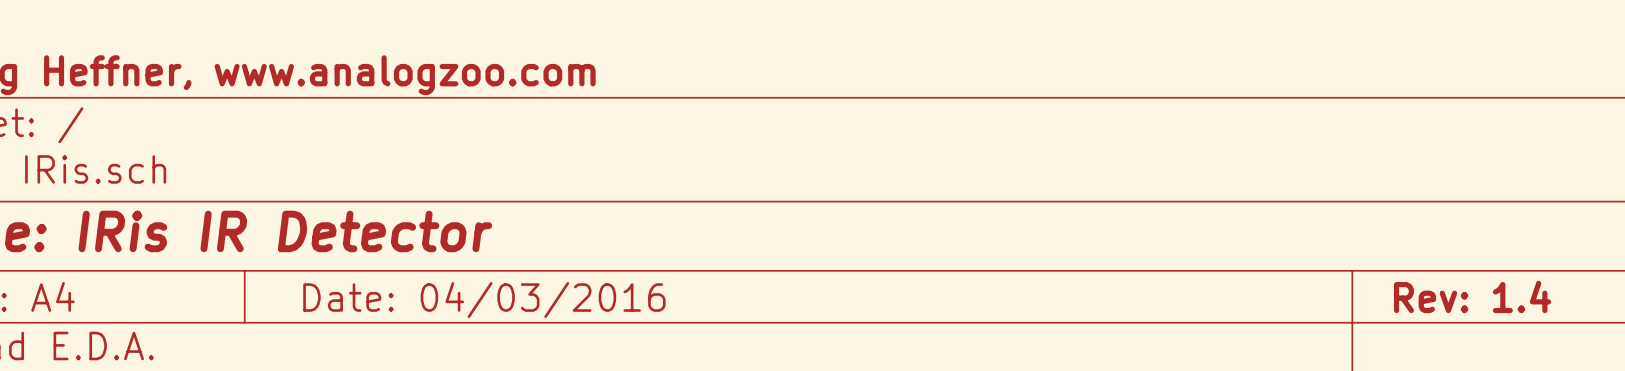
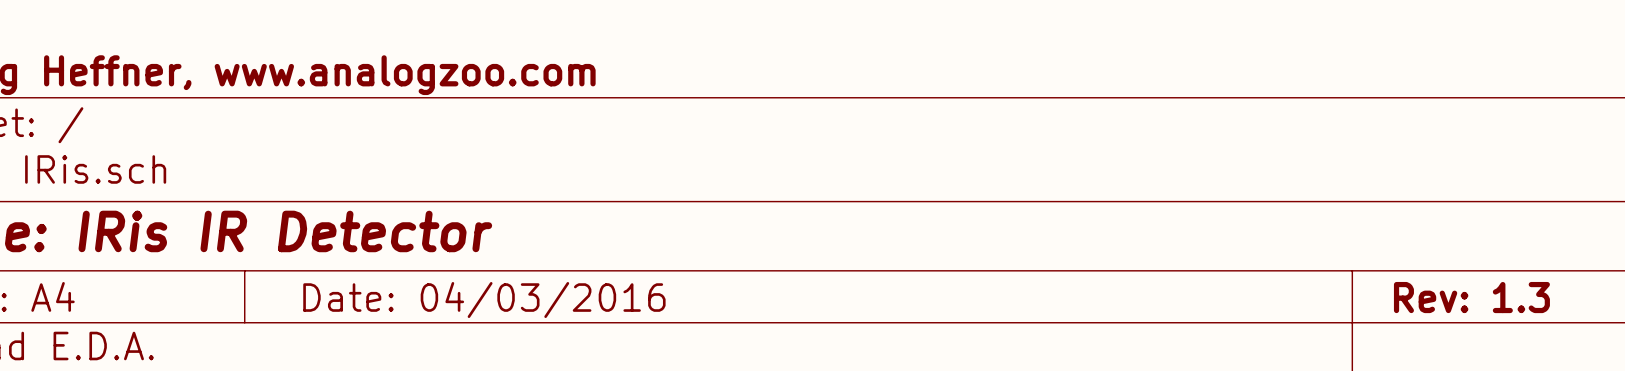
title block: Rev: 1.4 (1472, 296) -> Rev: 1.3 (1471, 297)

